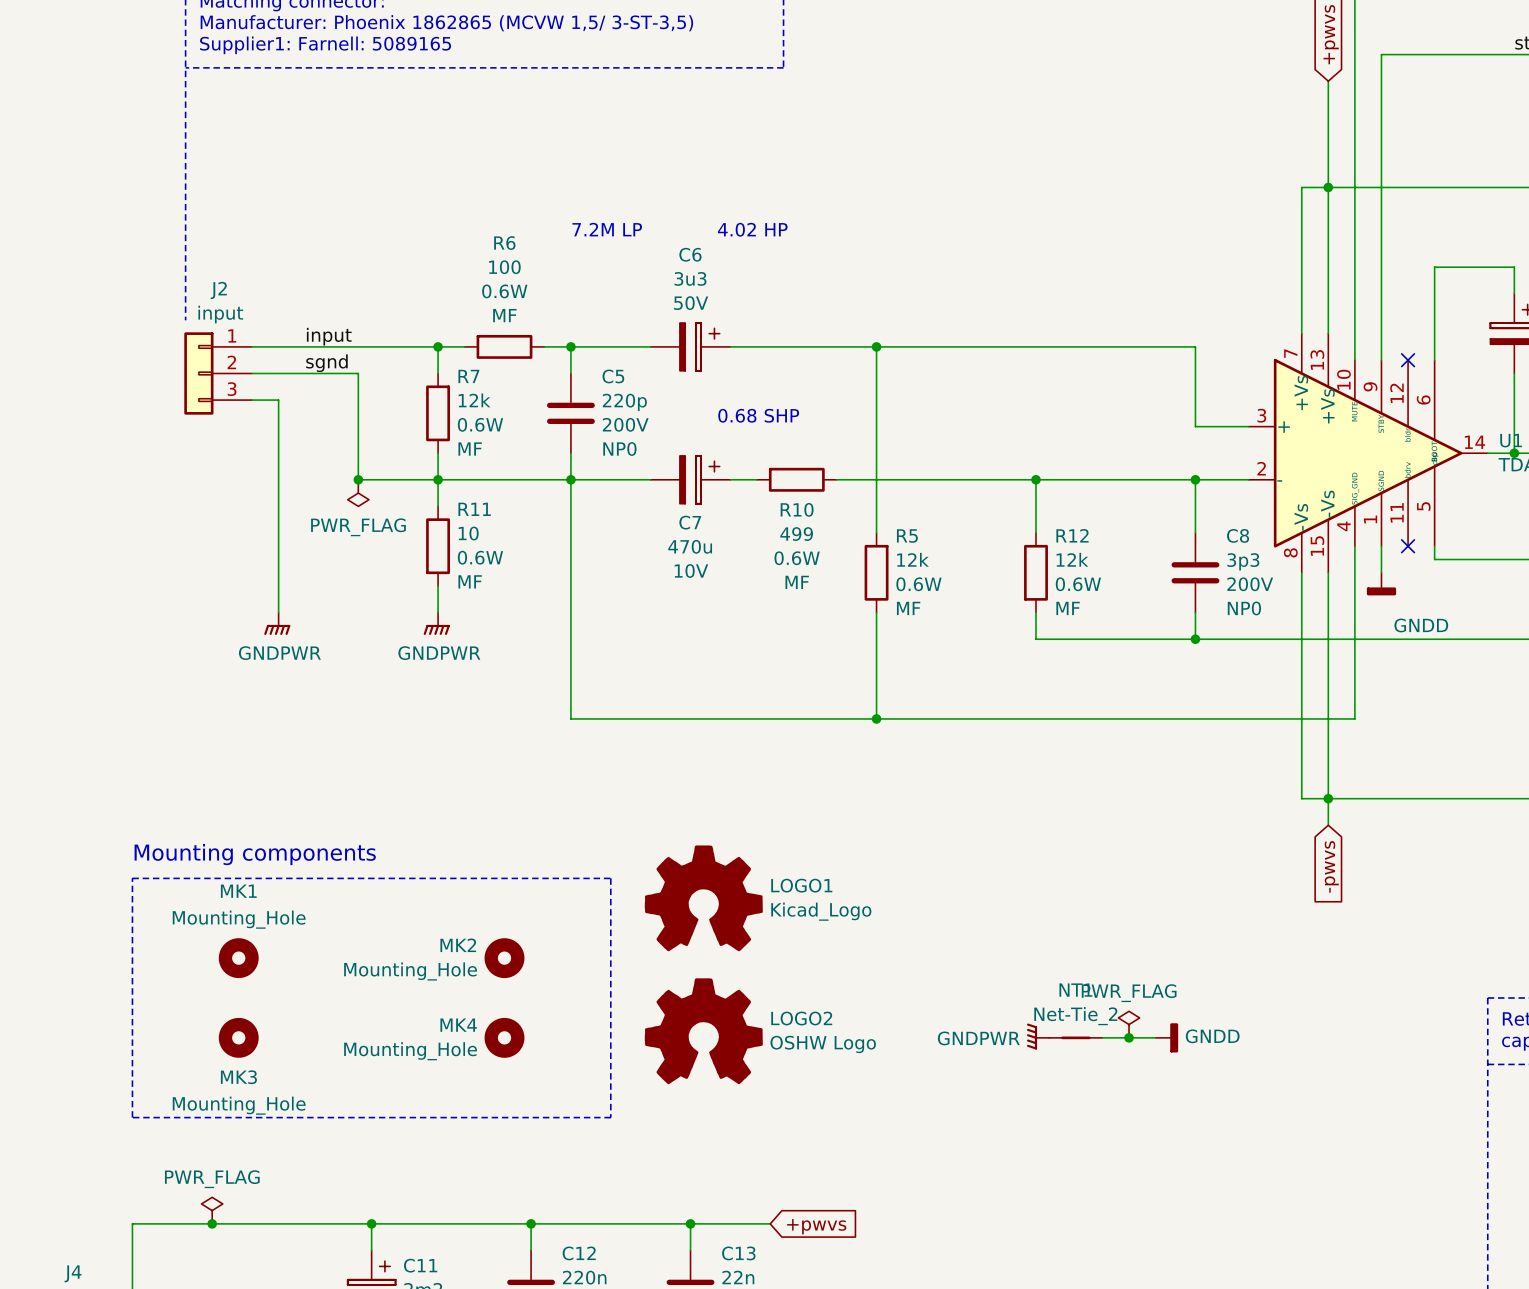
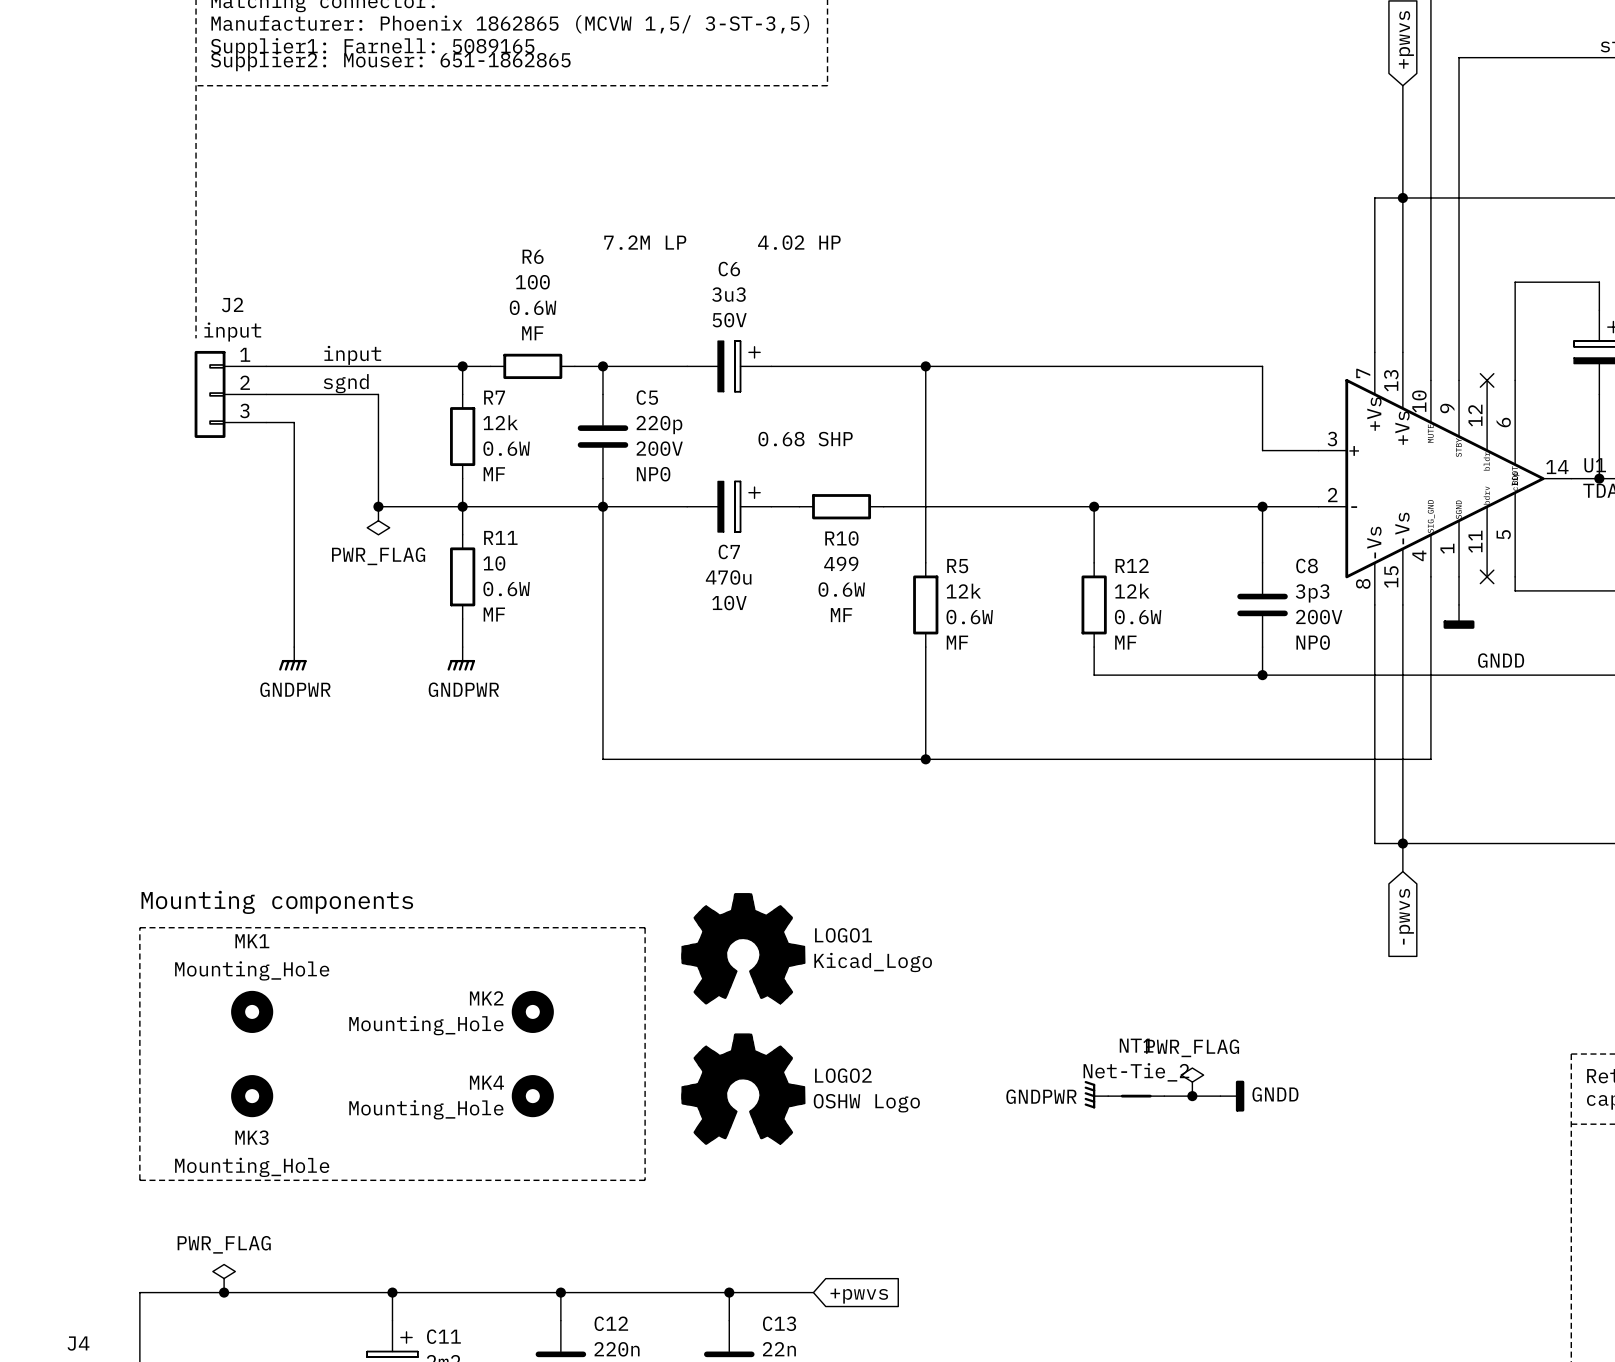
text: none -> Supplier2: Mouser: 651-1862865 (390, 61)
line: (185, 67) (783, 67) -> (196, 85) (827, 85) (827, 71)

